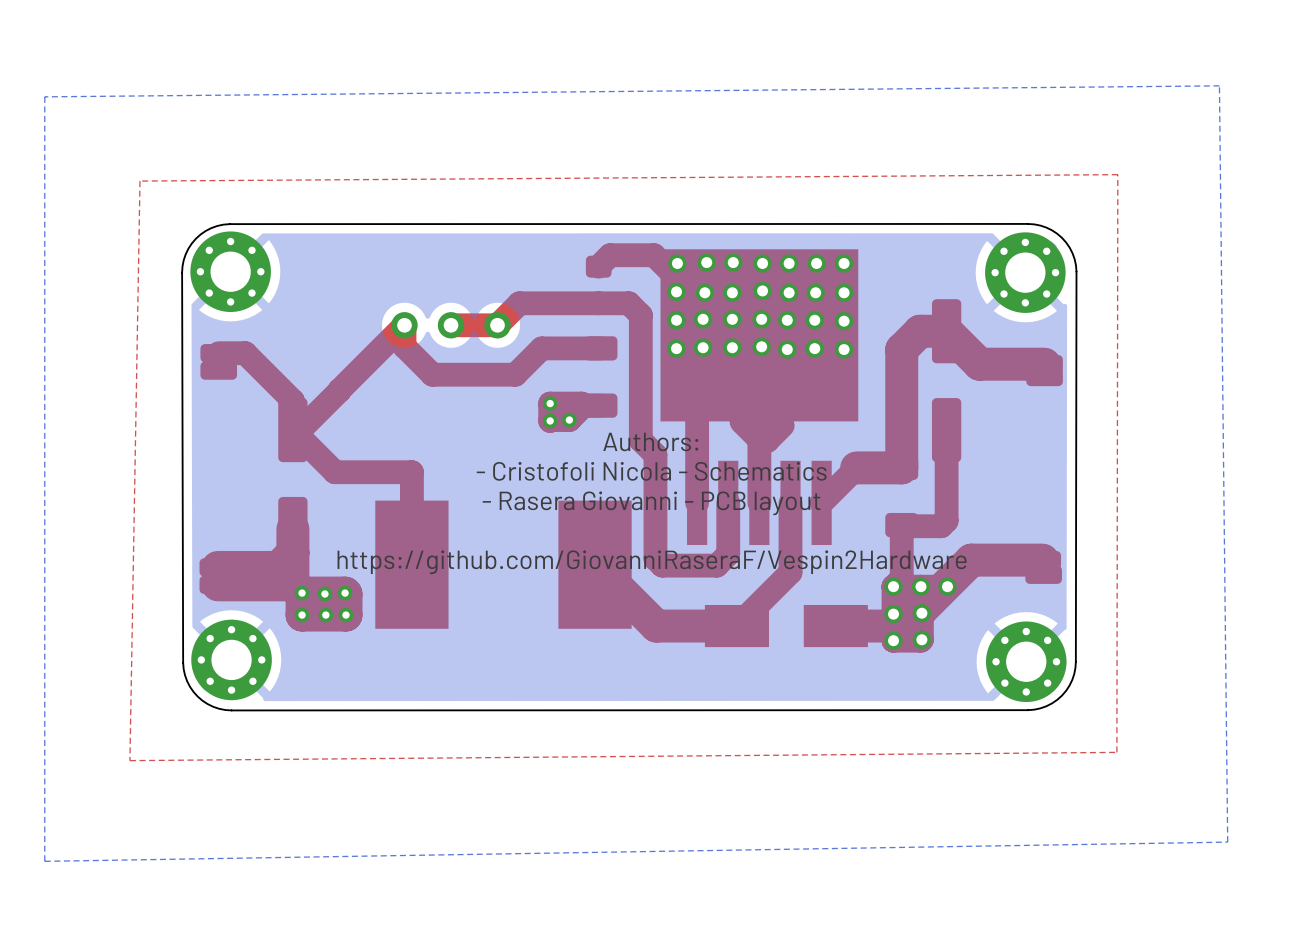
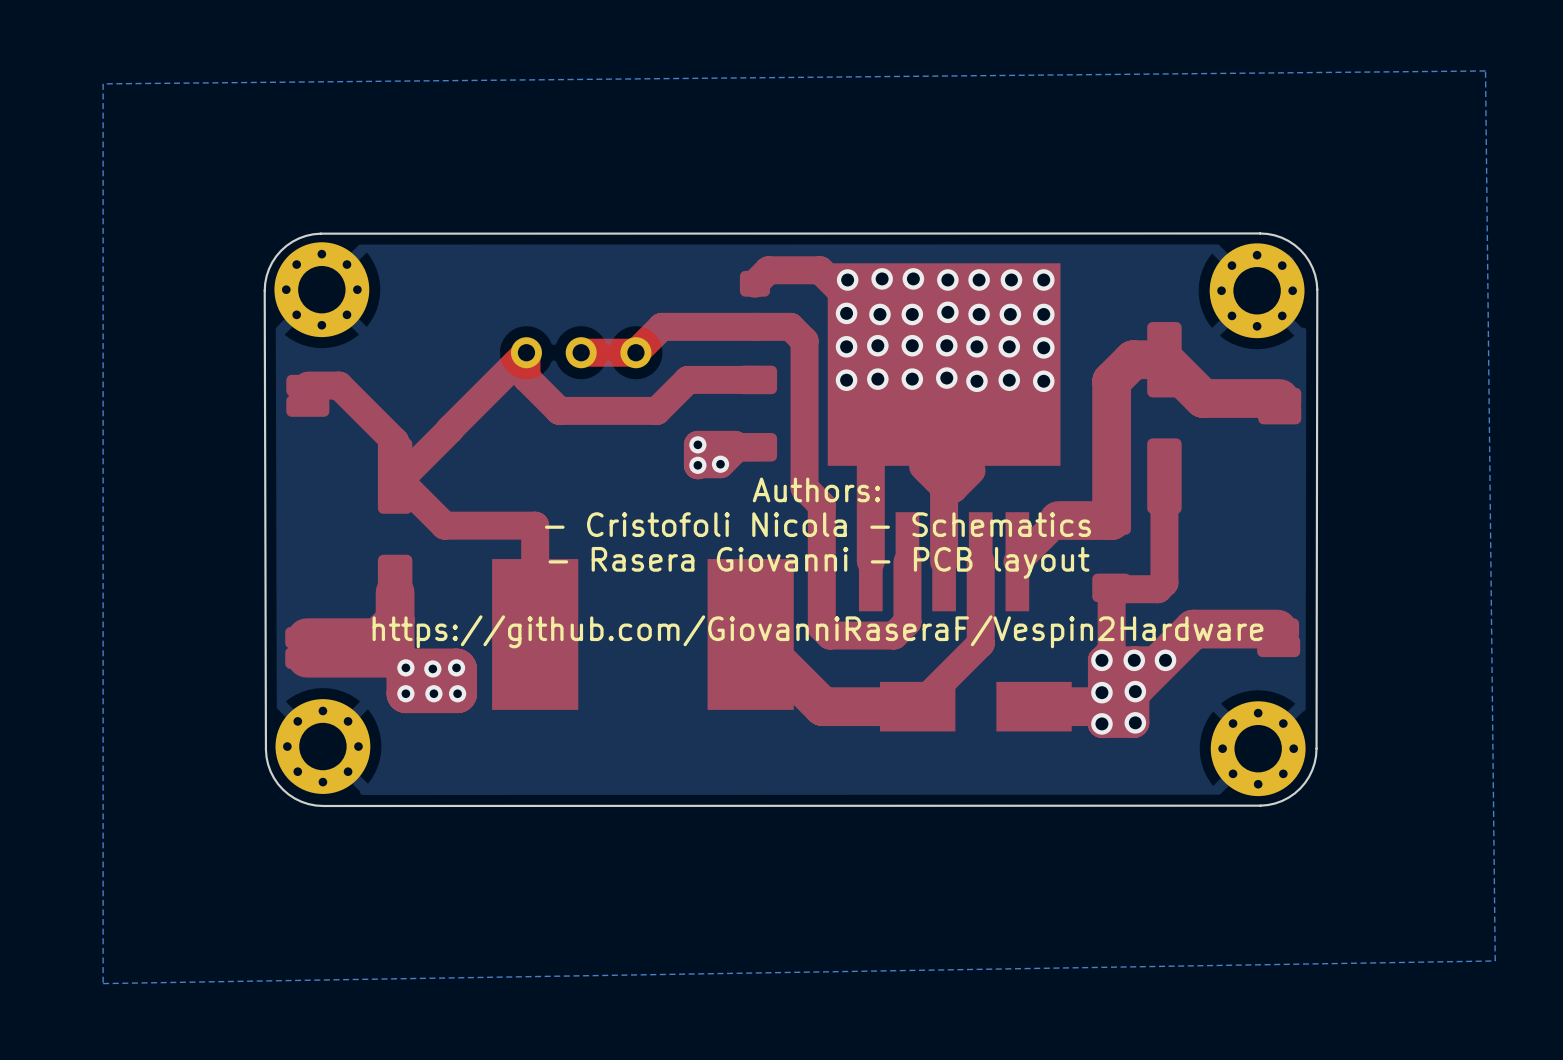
top zone outline: (1117, 174) (1116, 752) (129, 760) (140, 181) (1117, 174) -> none

